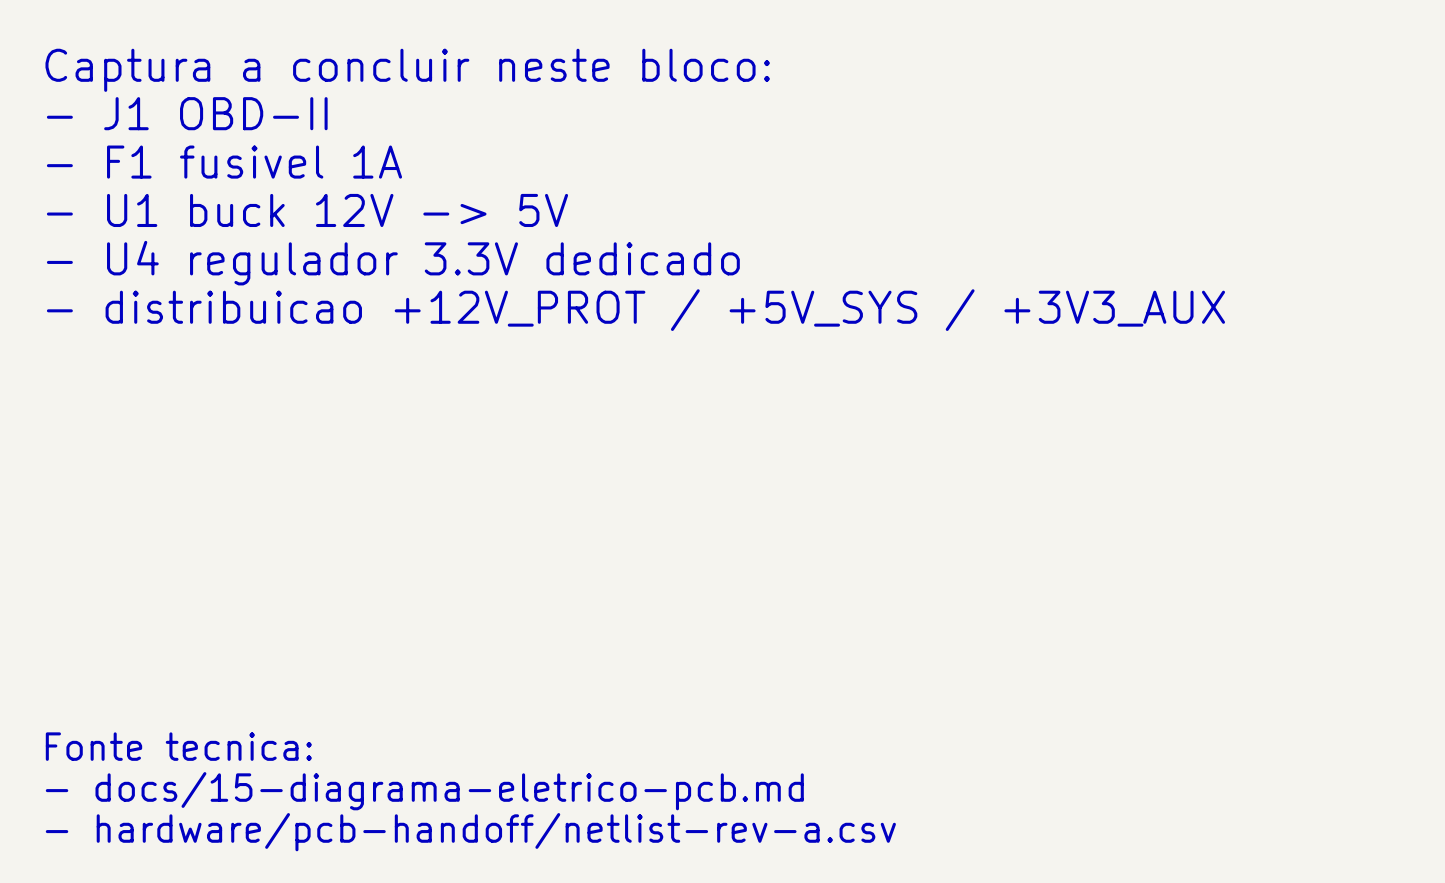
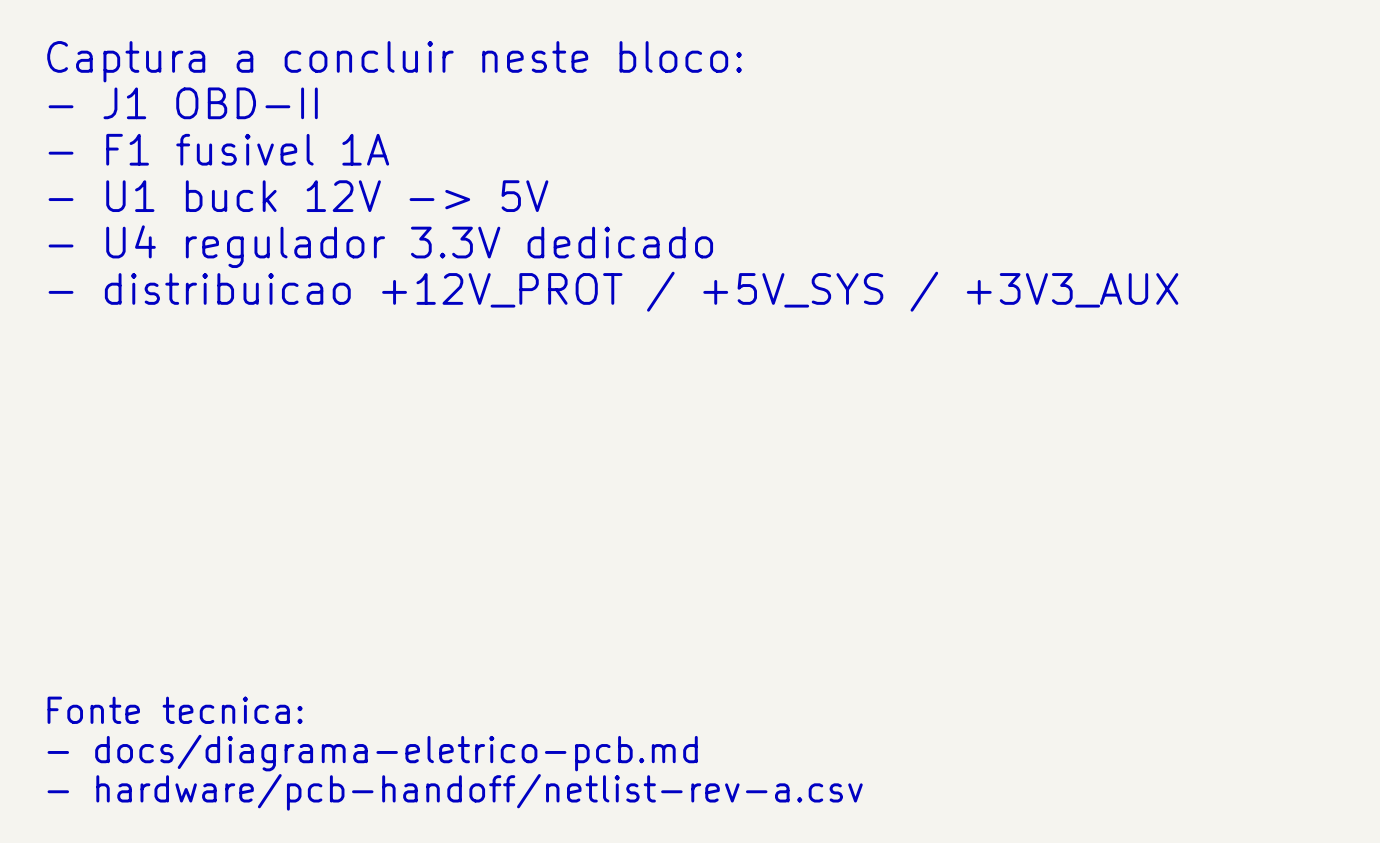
text: - docs/15-diagrama-eletrico-pcb.md (424, 791) -> - docs/diagrama-eletrico-pcb.md (372, 753)

